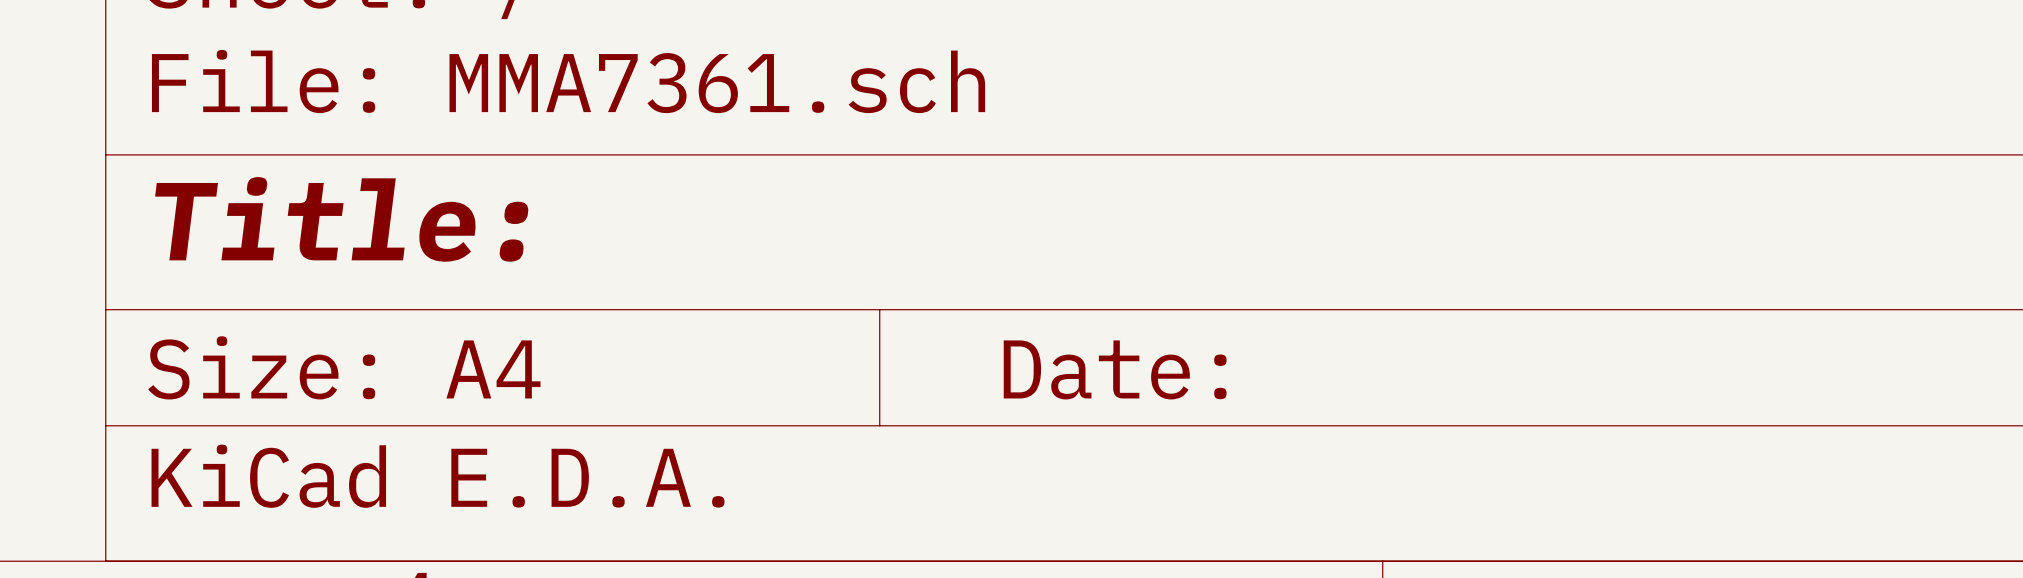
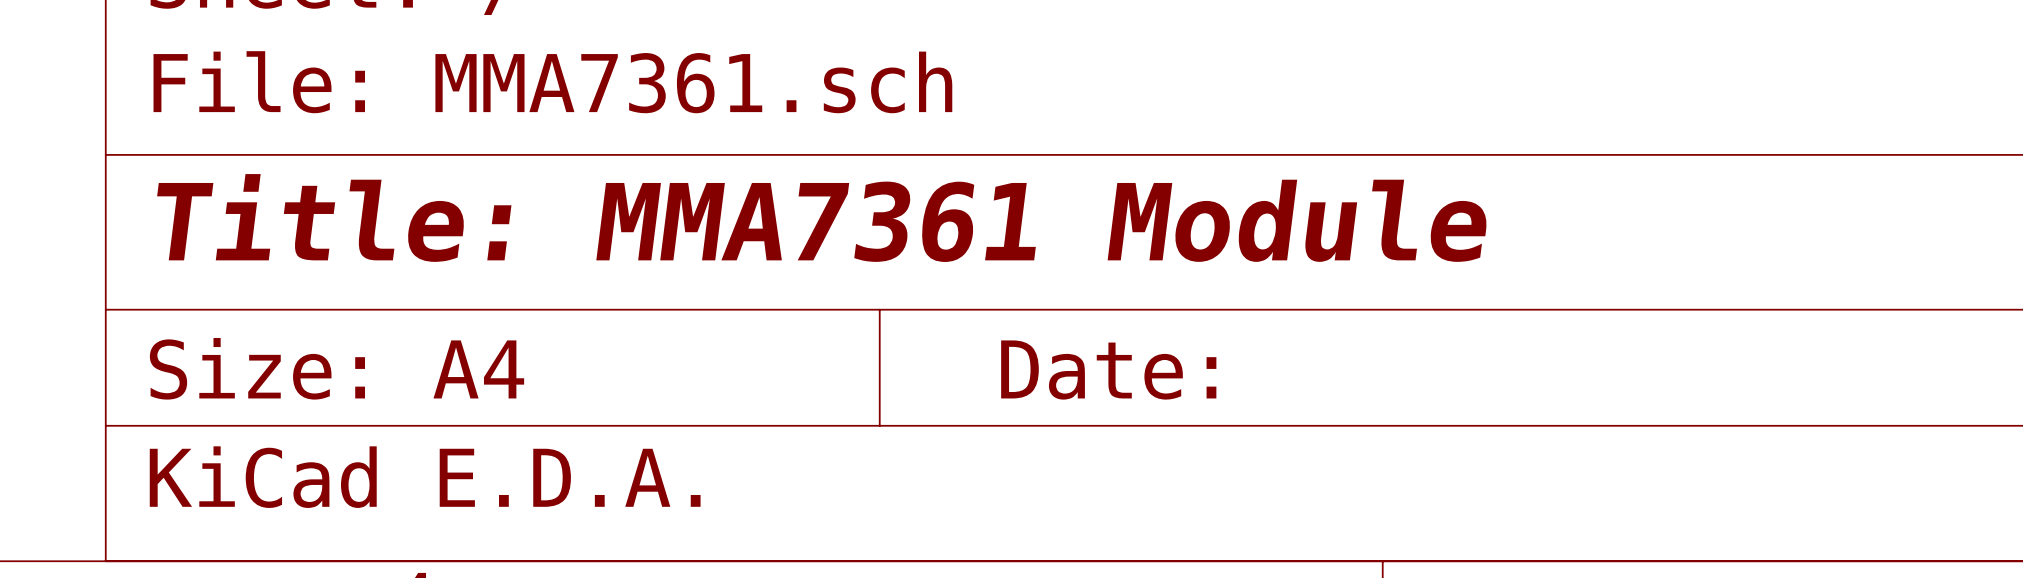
title block: Title: (341, 219) -> Title: MMA7361 Module (822, 218)

